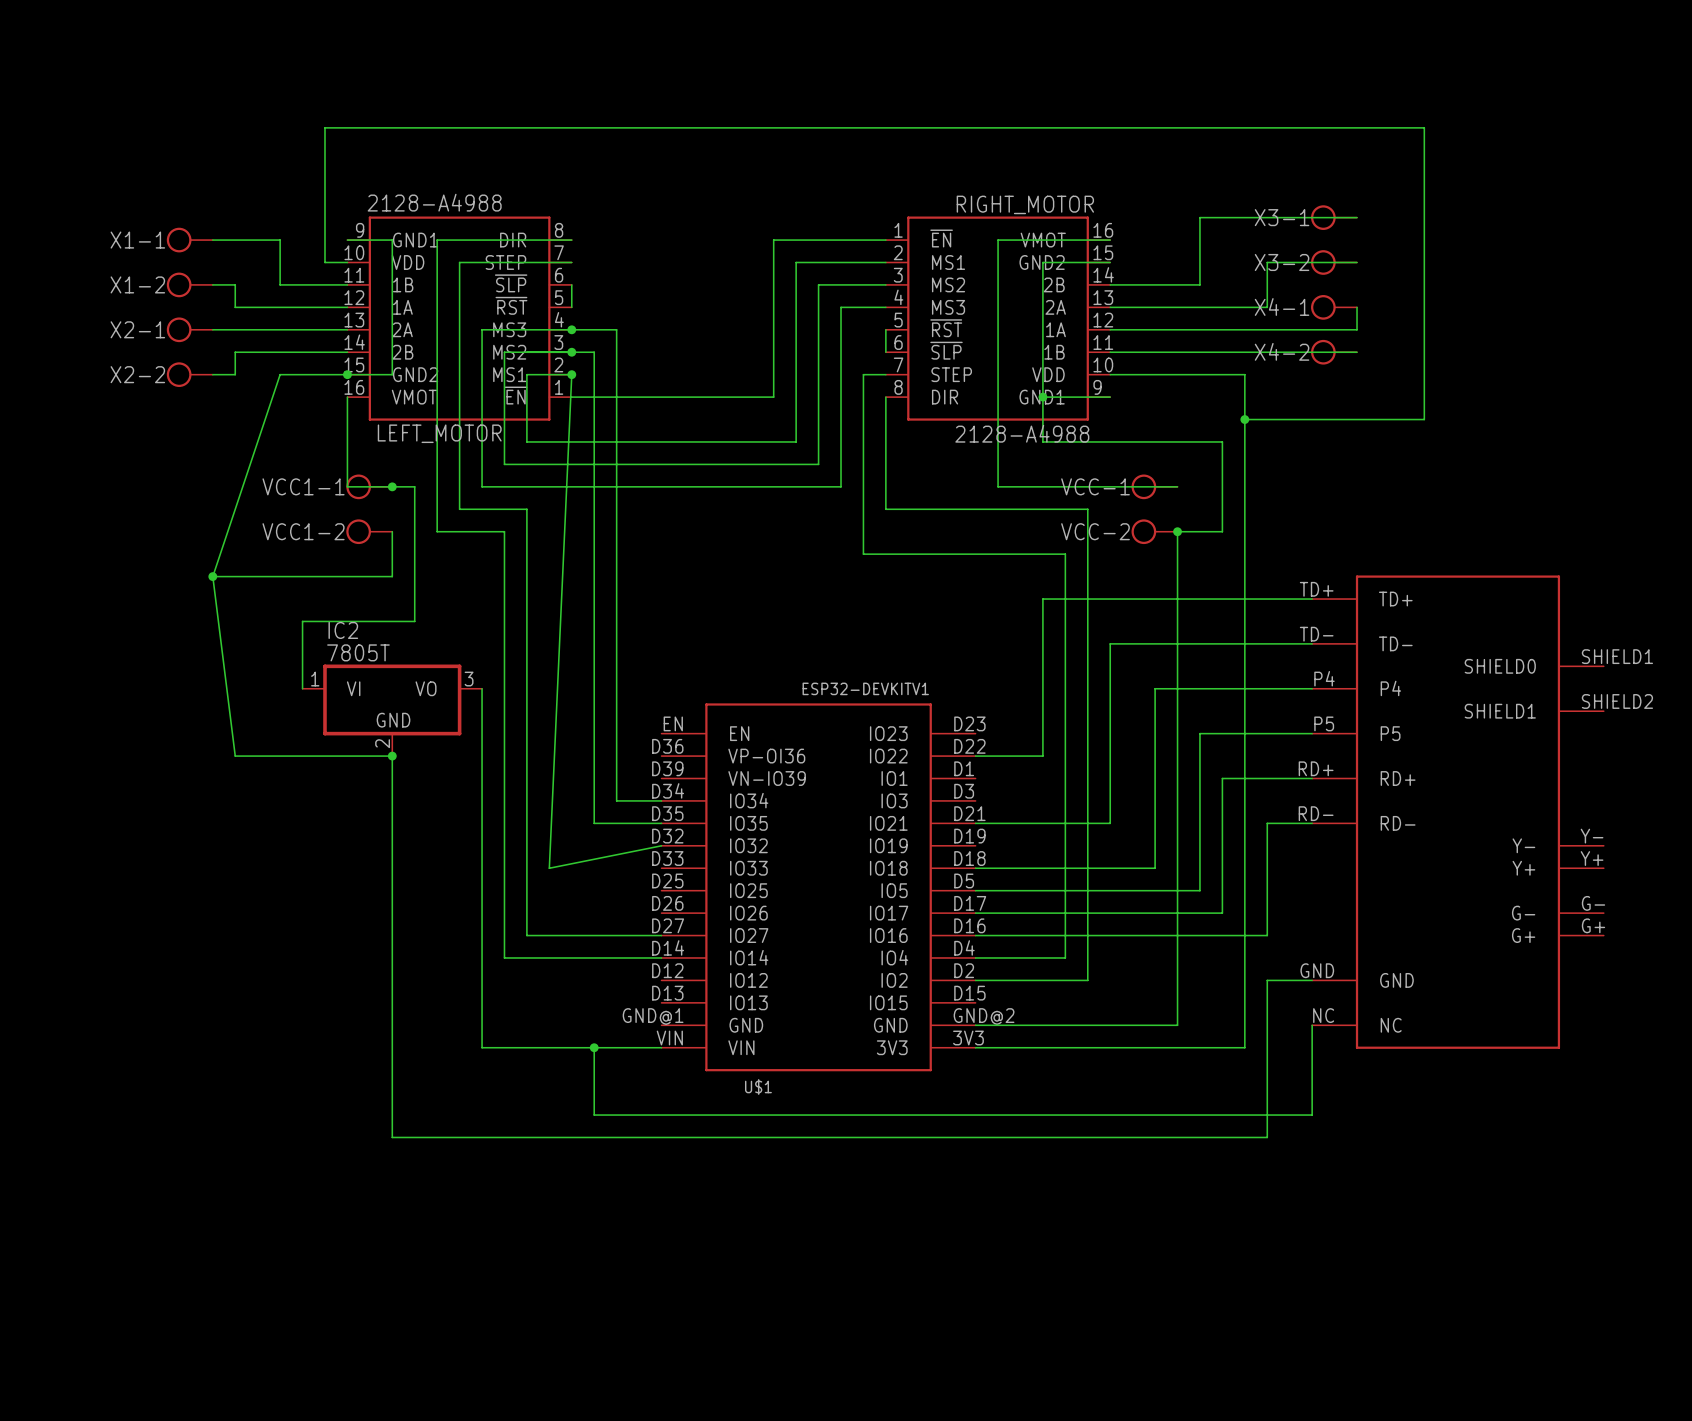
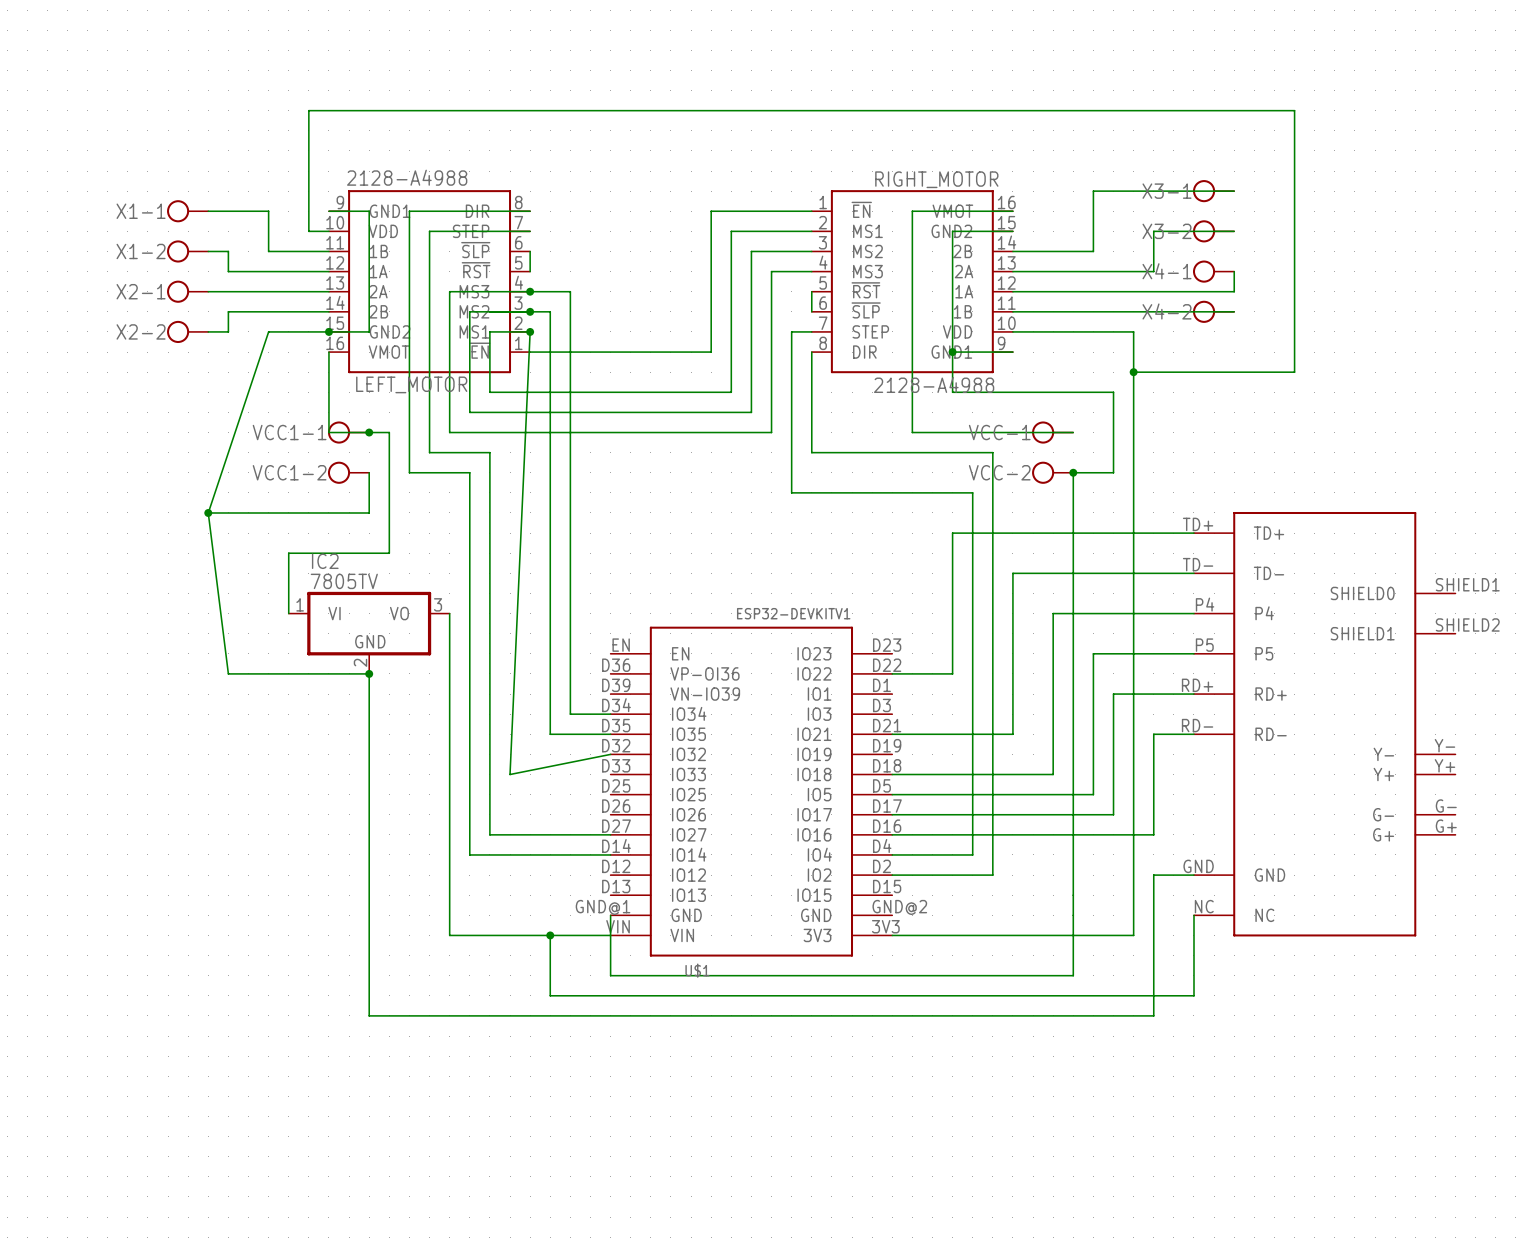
IC2 value: 7805T (358, 652) -> 7805TV (344, 581)
wire: (975, 1025) (1177, 1025) -> (610, 915) (610, 975) (1073, 975) (1073, 915)

